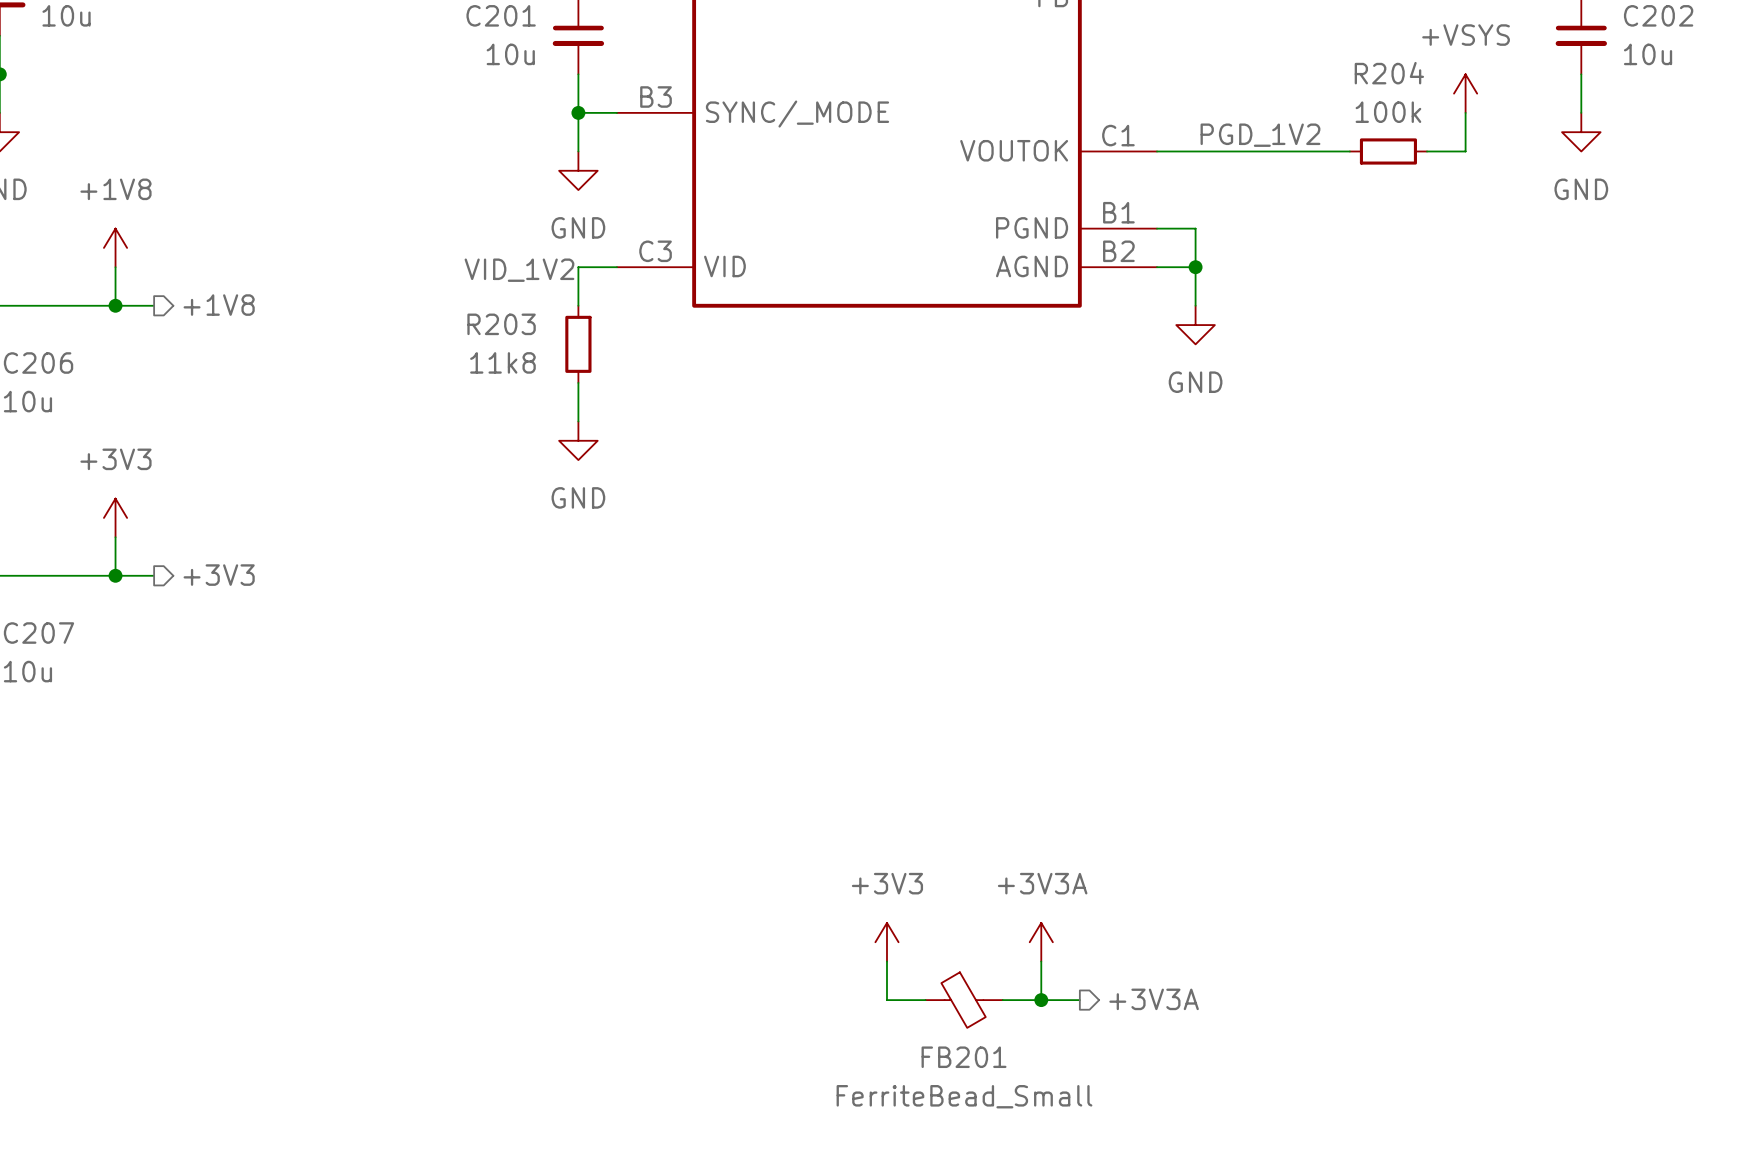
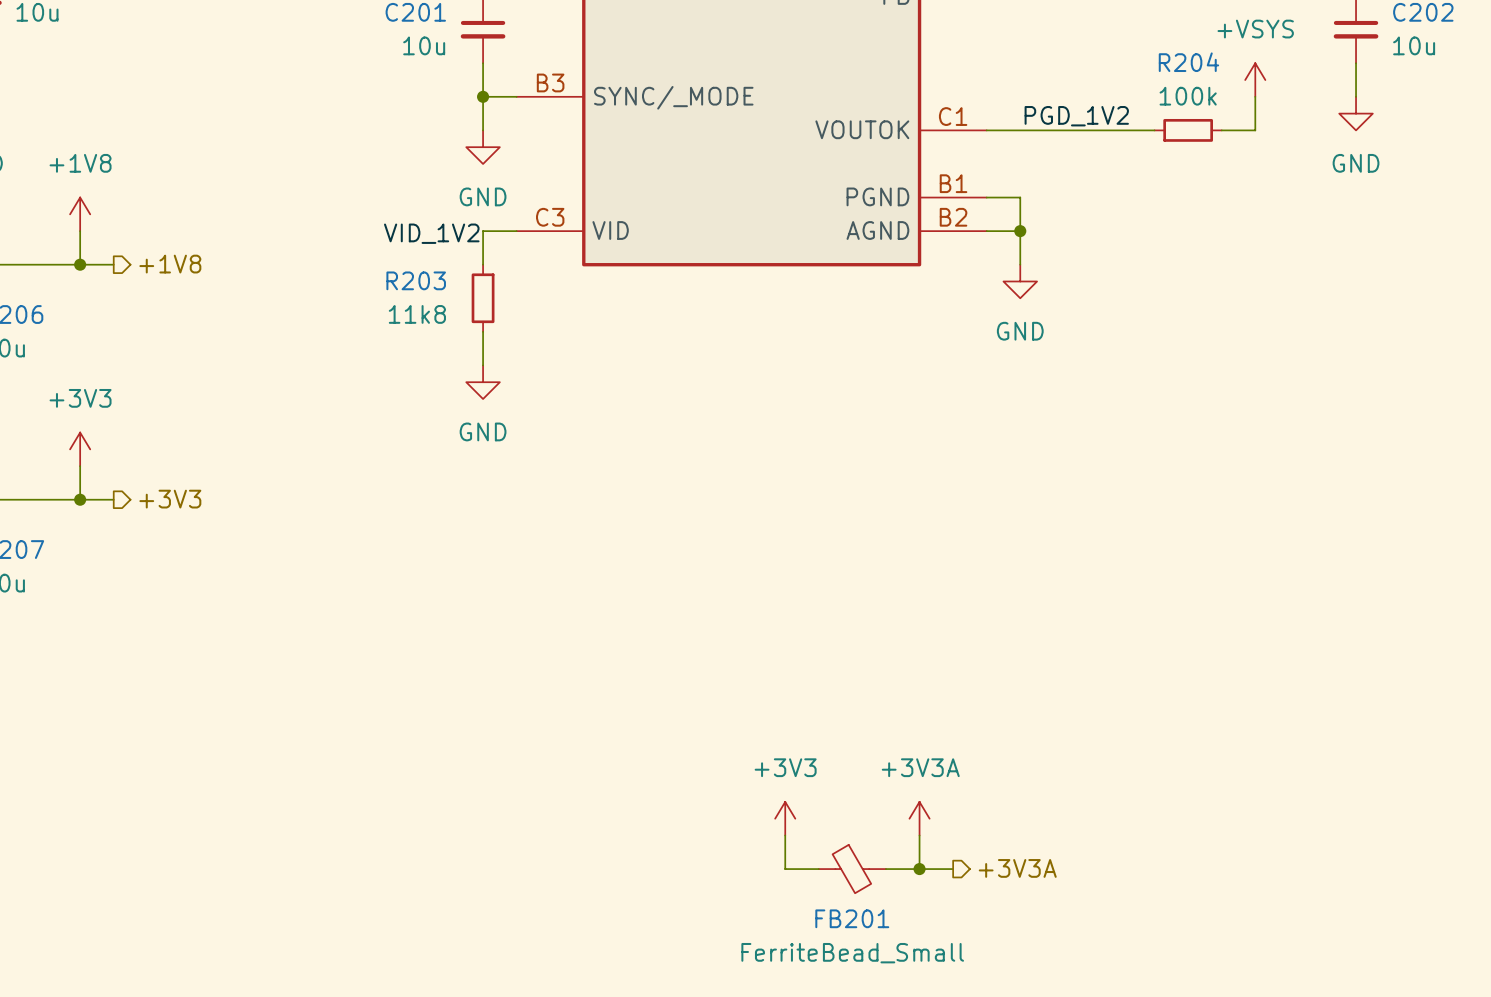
power symbol position: +3V3 (886, 942) -> +3V3 (785, 818)
power symbol position: +3V3A (1041, 942) -> +3V3A (919, 818)
wire: (886, 961) (886, 1000) (925, 1000) -> (785, 835) (785, 869) (818, 869)
wire: (1041, 961) (1041, 1000) (1002, 1000) -> none
wire: none -> (919, 835) (919, 869) (953, 869)
hierarchical label position: +3V3A (1154, 999) -> +3V3A (1017, 868)
FB201 position: (964, 1000) -> (852, 869)
junction position: (1041, 1000) -> (919, 869)

